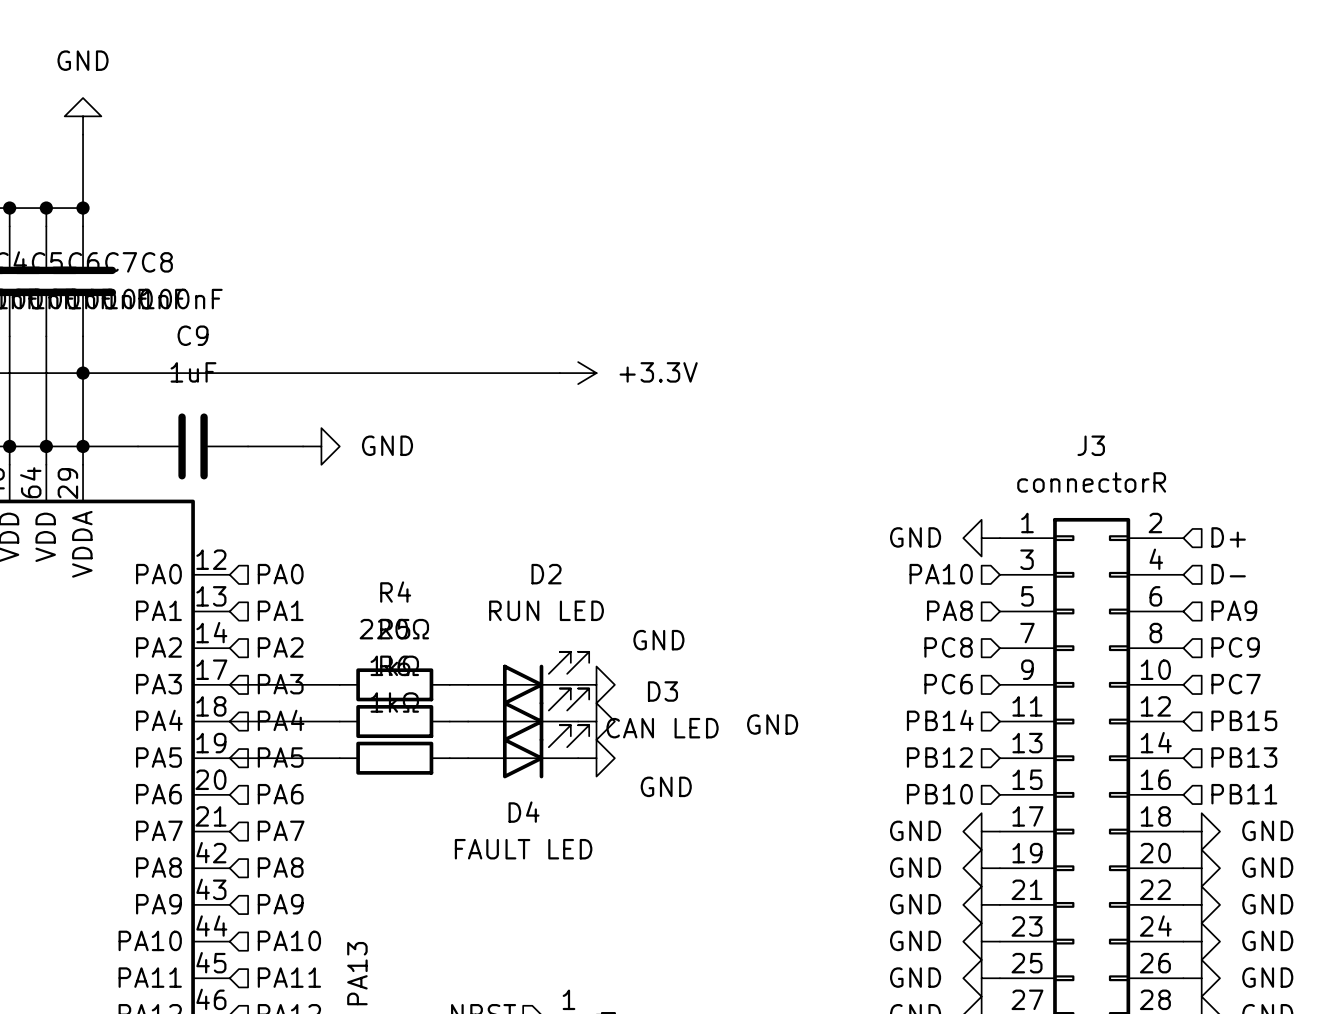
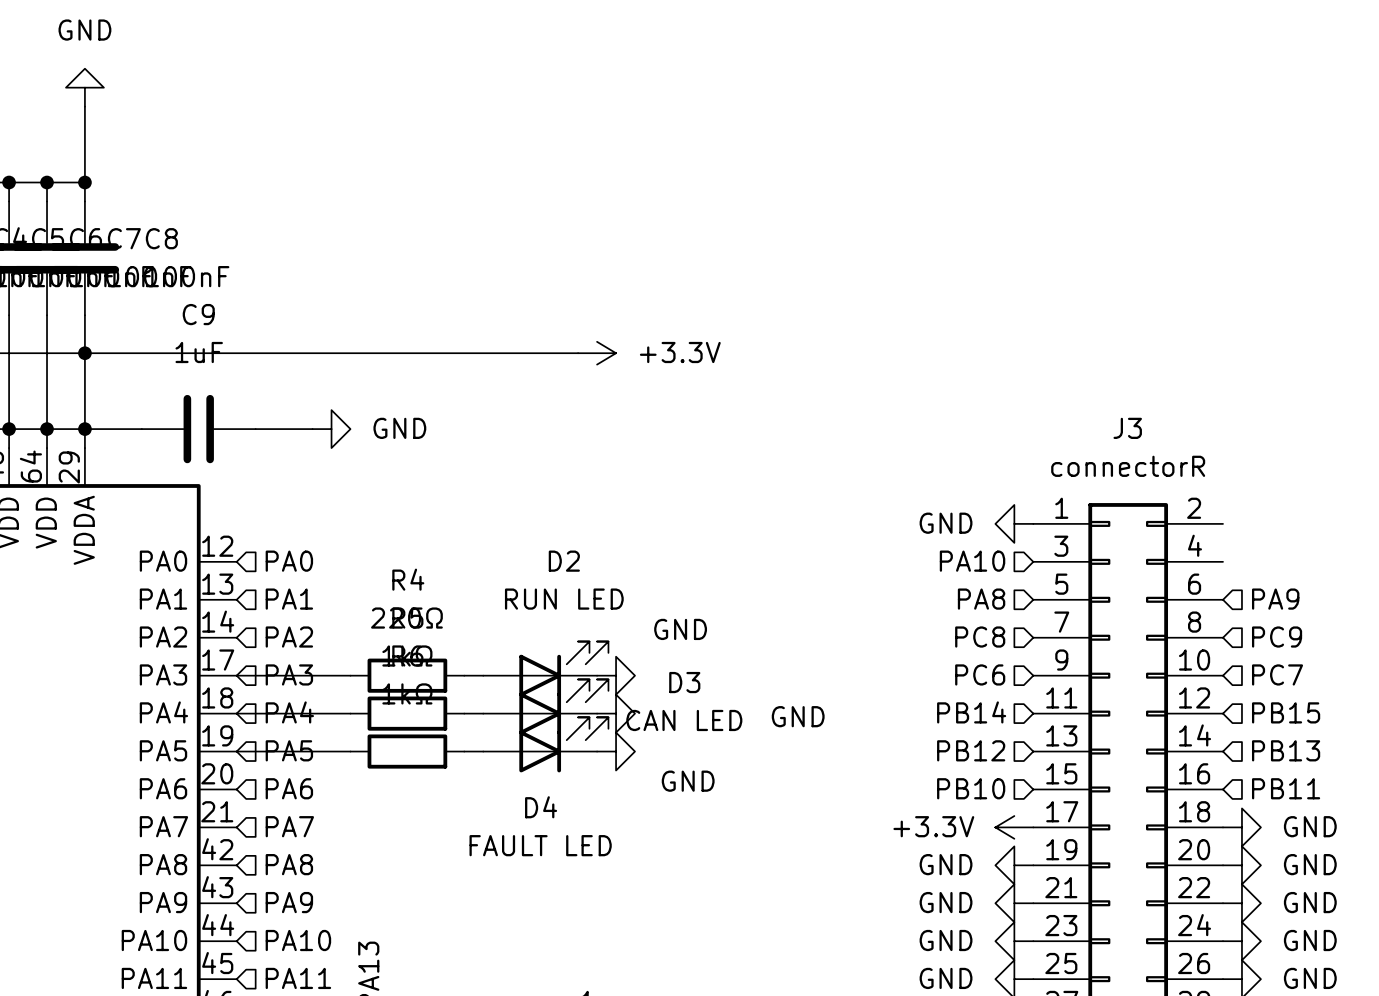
hierarchical label: D+ (1228, 537) -> none
hierarchical label: D- (1228, 574) -> none
power symbol: GND (981, 831) -> +3.3V (1014, 827)

